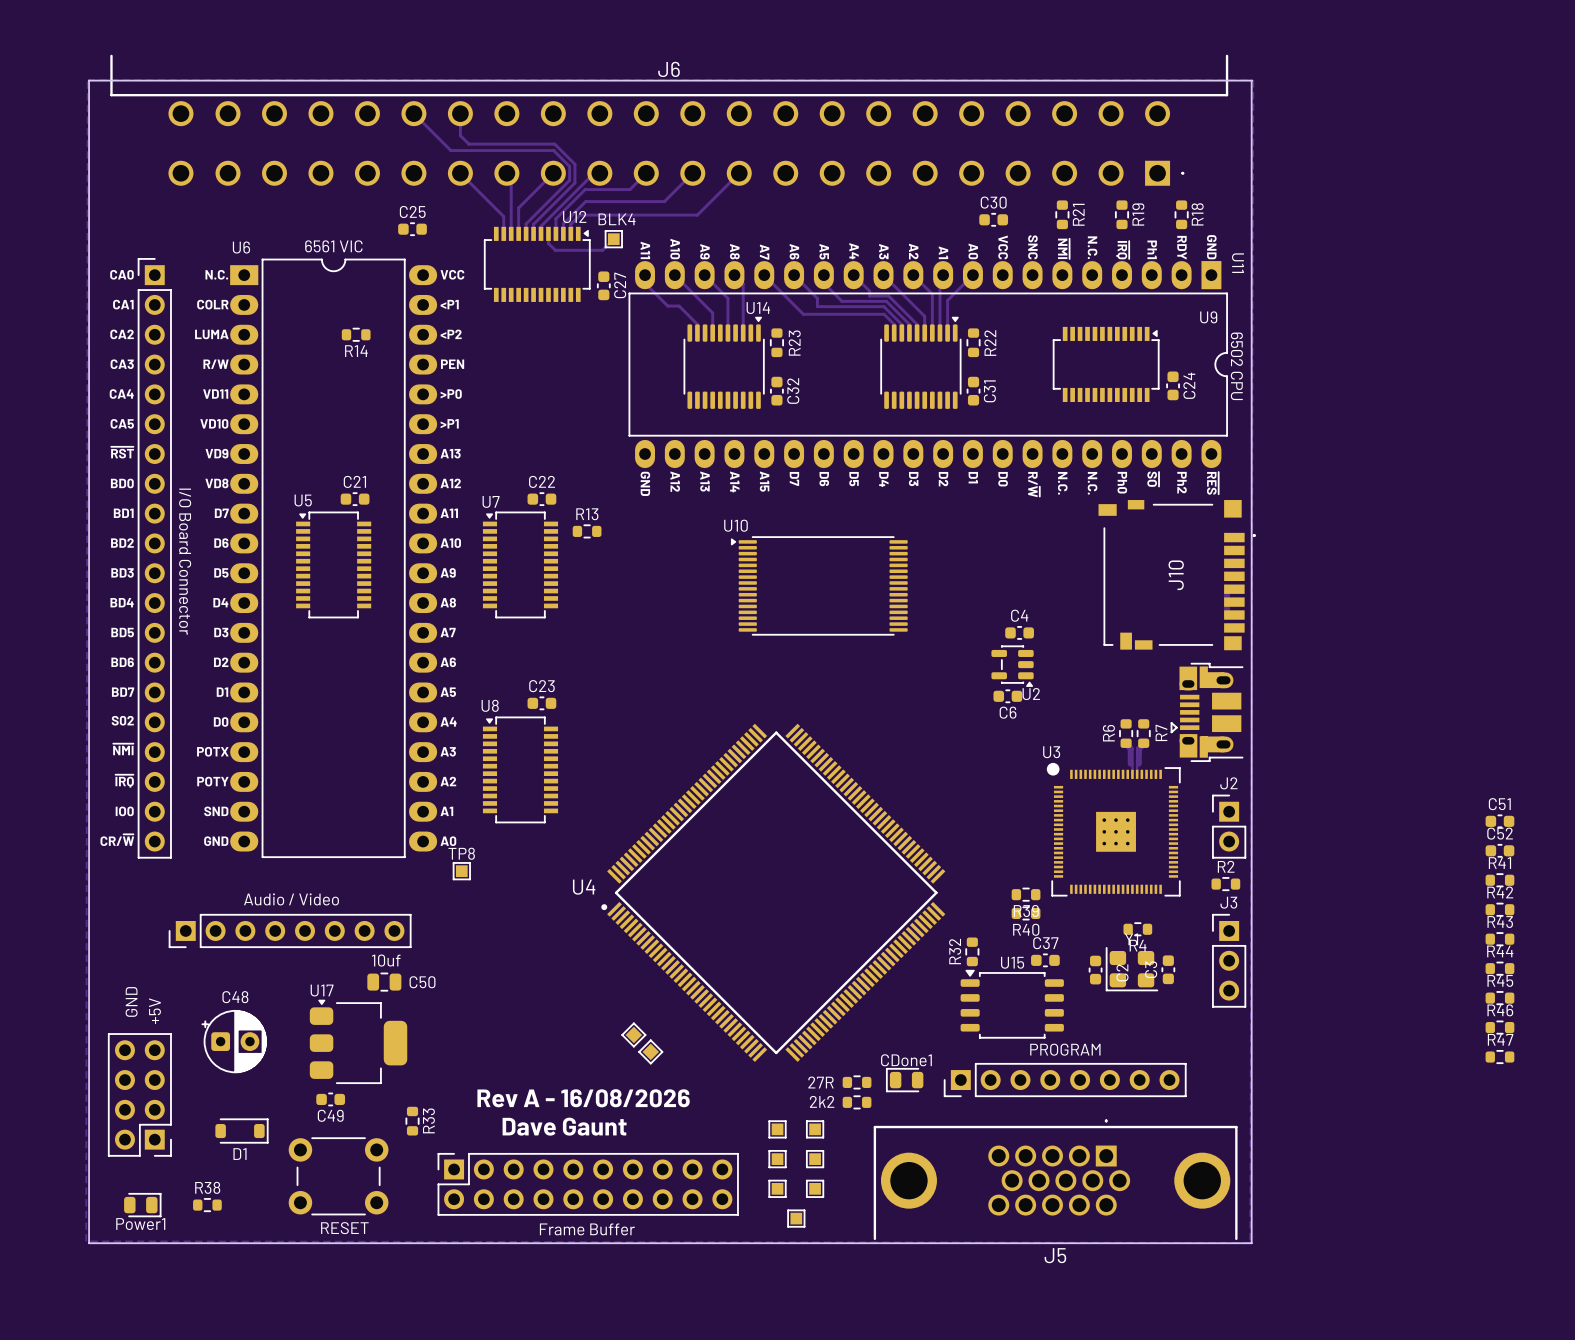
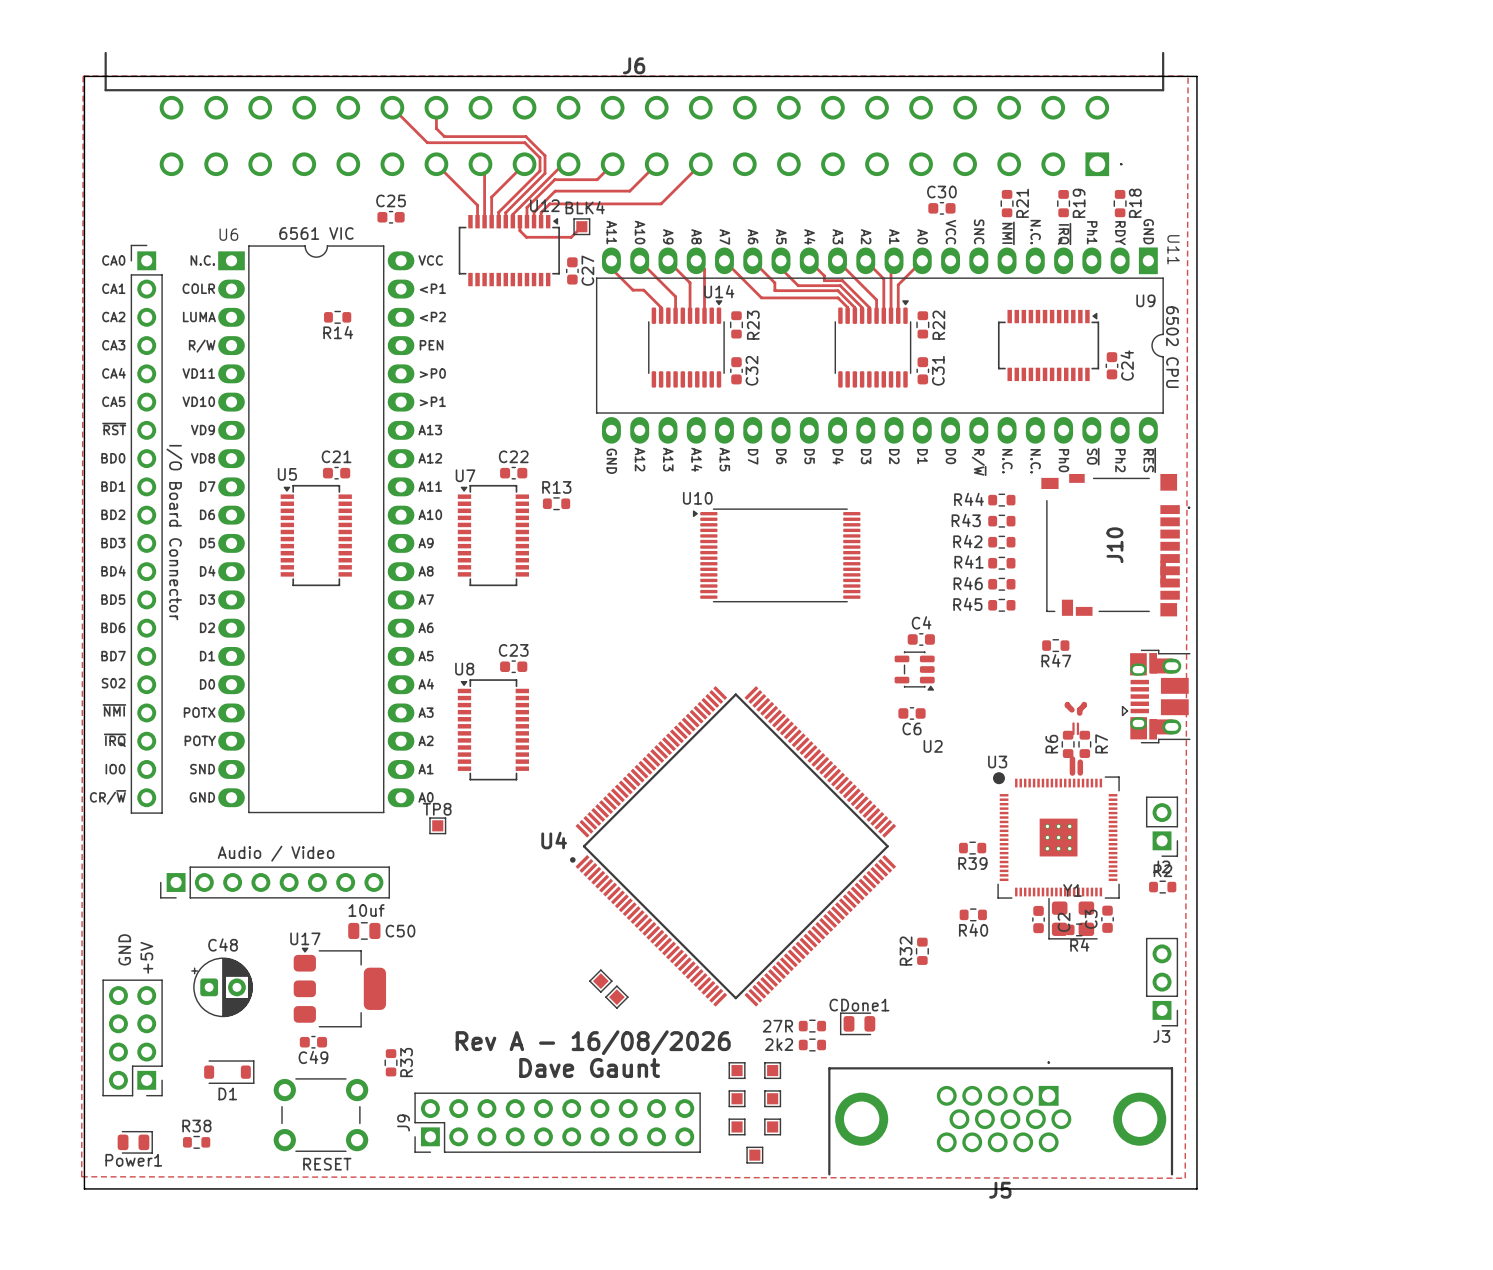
board edge: (1251, 80) (1251, 1243) (89, 1243) -> (1186, 76) (1196, 76) (1196, 1188) (84, 1188) (84, 1178)
C4 position: (1019, 632) -> (921, 639)
U2 position: (1012, 666) -> (914, 671)
U2 name position: U2 (1031, 694) -> U2 (933, 746)
C6 position: (1007, 696) -> (911, 713)
part position: (1207, 712) -> (1156, 696)
R6 position: (1126, 733) -> (1068, 744)
R7 position: (1143, 733) -> (1084, 744)
track: (1130, 748) (1130, 763) -> (1072, 758) (1072, 773)
track: (1138, 752) (1138, 763) -> (1080, 762) (1080, 772)
C51: (1499, 821) -> none
J2 rotation: 0° (1229, 826) -> 180° (1162, 826)
J2 position: (1229, 826) -> (1162, 826)
U3 position: (1113, 829) -> (1056, 835)
C52: (1499, 850) -> none
R41 name position: R41 (1499, 863) -> R41 (969, 561)
R41 position: (1499, 880) -> (1001, 563)
R2 position: (1225, 884) -> (1162, 887)
R42 name position: R42 (1500, 892) -> R42 (967, 541)
R42 position: (1499, 909) -> (1001, 542)
R40 position: (1026, 913) -> (973, 914)
R43 name position: R43 (1500, 922) -> R43 (966, 520)
R4 position: (1137, 929) -> (1079, 929)
R43 position: (1499, 939) -> (1001, 521)
R32 position: (972, 951) -> (922, 951)
R44 name position: R44 (1500, 951) -> R44 (968, 499)
C37: (1045, 960) -> none
J3 rotation: 0° (1229, 960) -> 180° (1162, 982)
J3 position: (1229, 960) -> (1162, 982)
R44 position: (1499, 968) -> (1001, 500)
R45 name position: R45 (1500, 980) -> R45 (967, 604)
R45 position: (1499, 998) -> (1001, 605)
U15: (1012, 1004) -> none
R46 name position: R46 (1500, 1010) -> R46 (968, 583)
R46 position: (1499, 1027) -> (1001, 584)
R47 name position: R47 (1500, 1039) -> R47 (1056, 660)
R47 position: (1499, 1057) -> (1055, 645)
part: PROGRAM (1065, 1080) -> none
part: Frame Buffer (588, 1184) -> none
J9: none -> (557, 1122)

